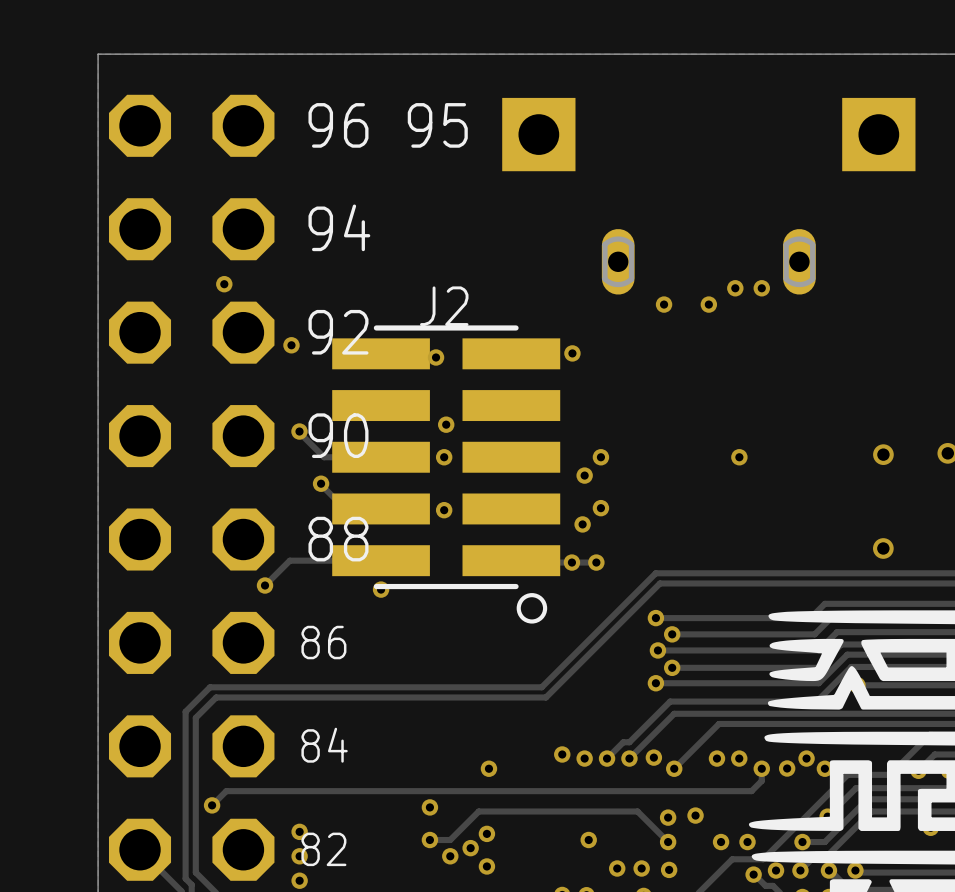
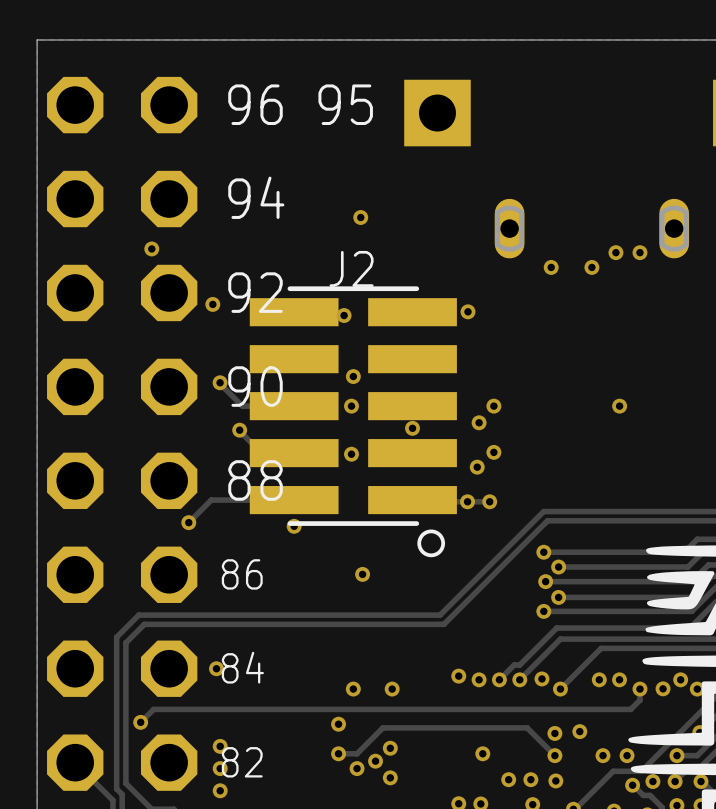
via: none -> (360, 217)
via: none -> (412, 428)
via: none -> (362, 574)
via: none -> (216, 668)
via: none -> (353, 689)

